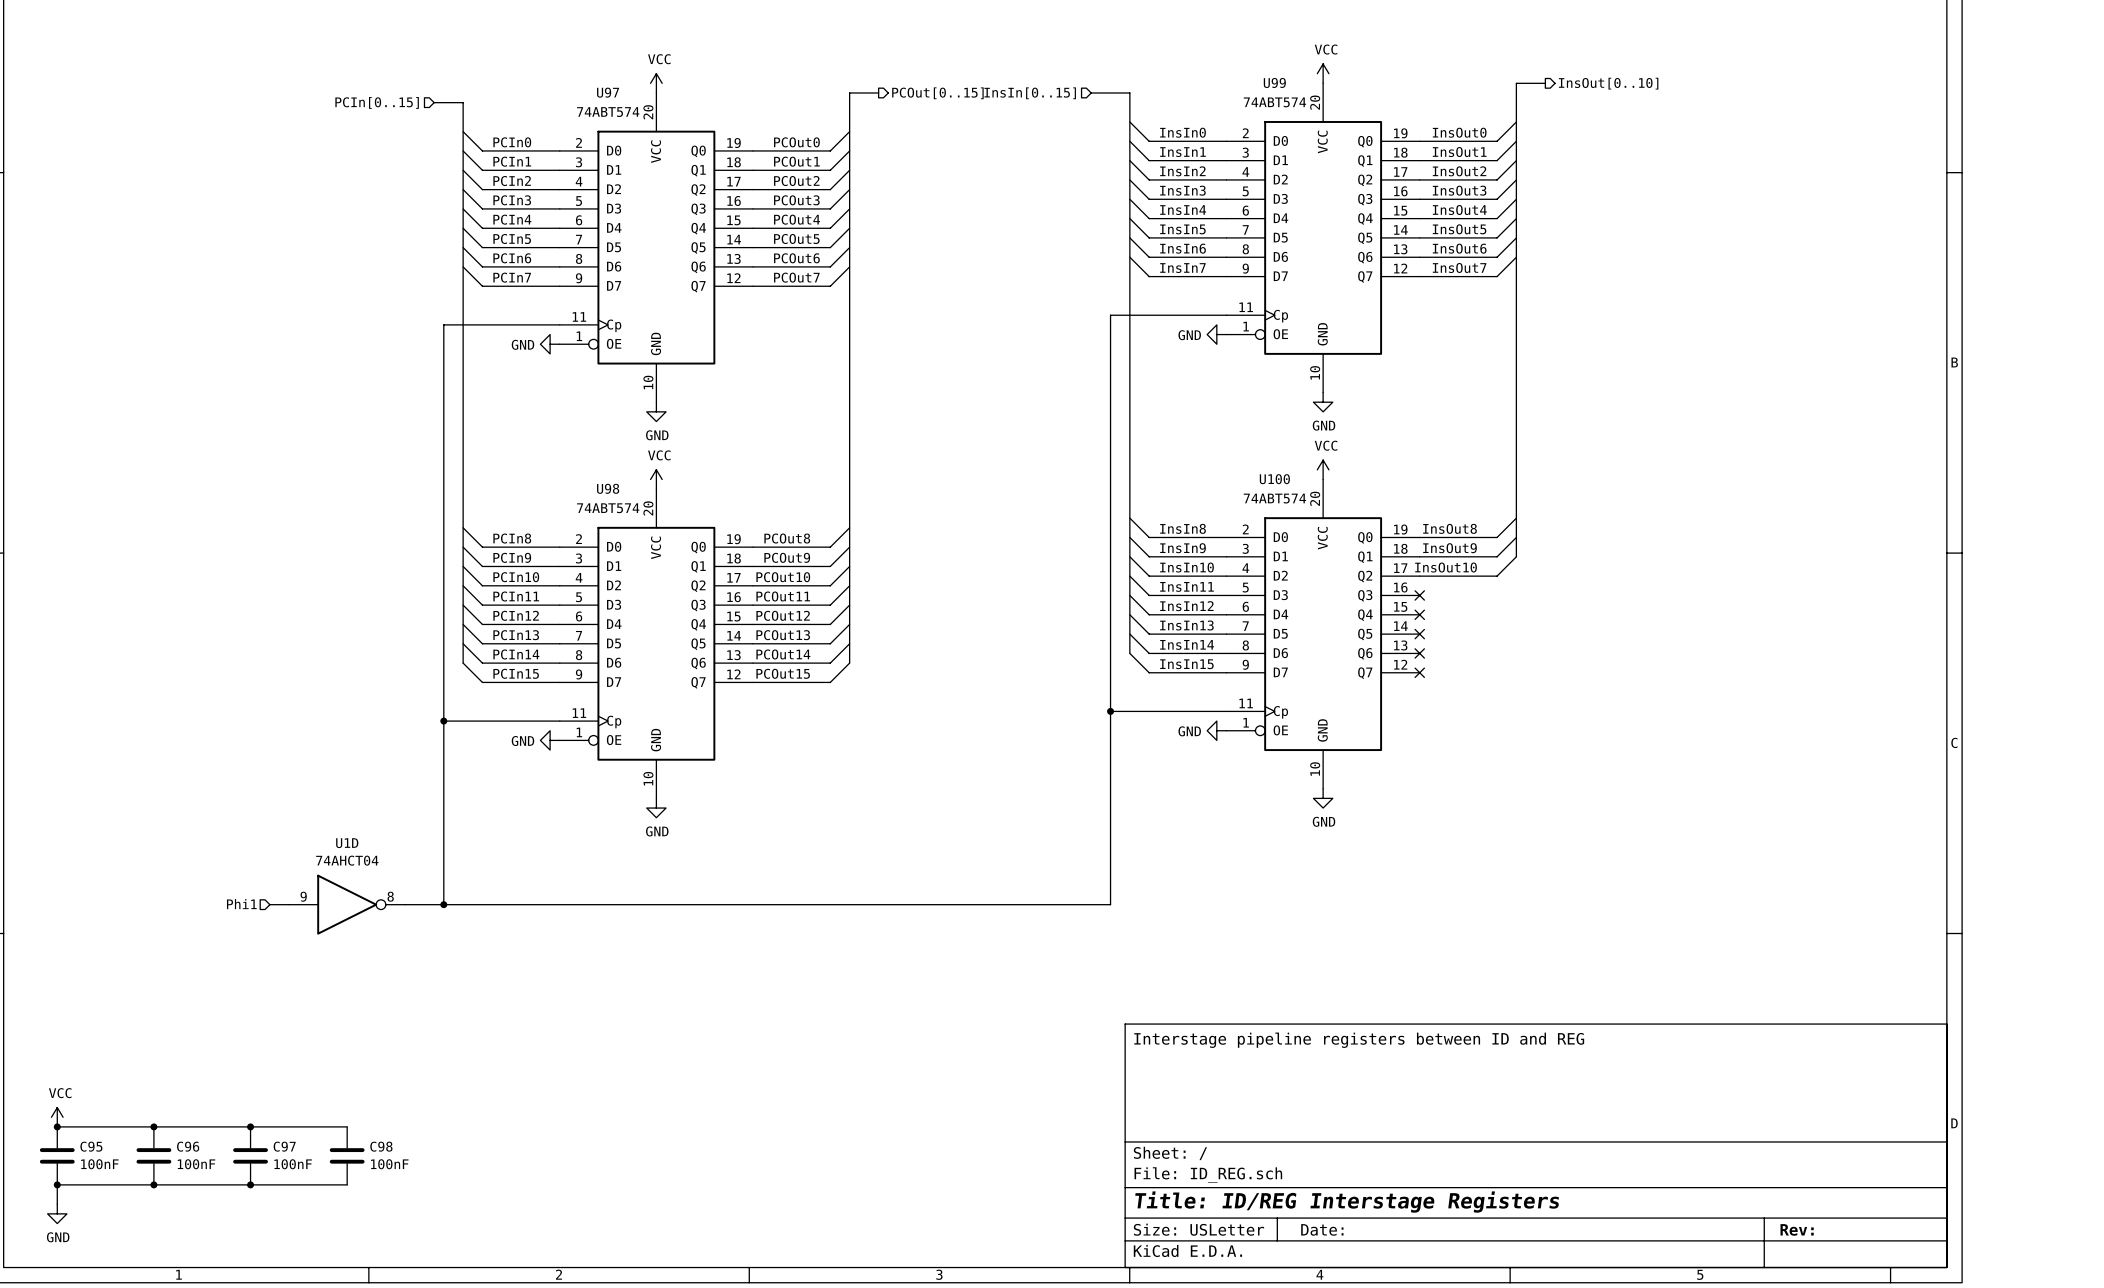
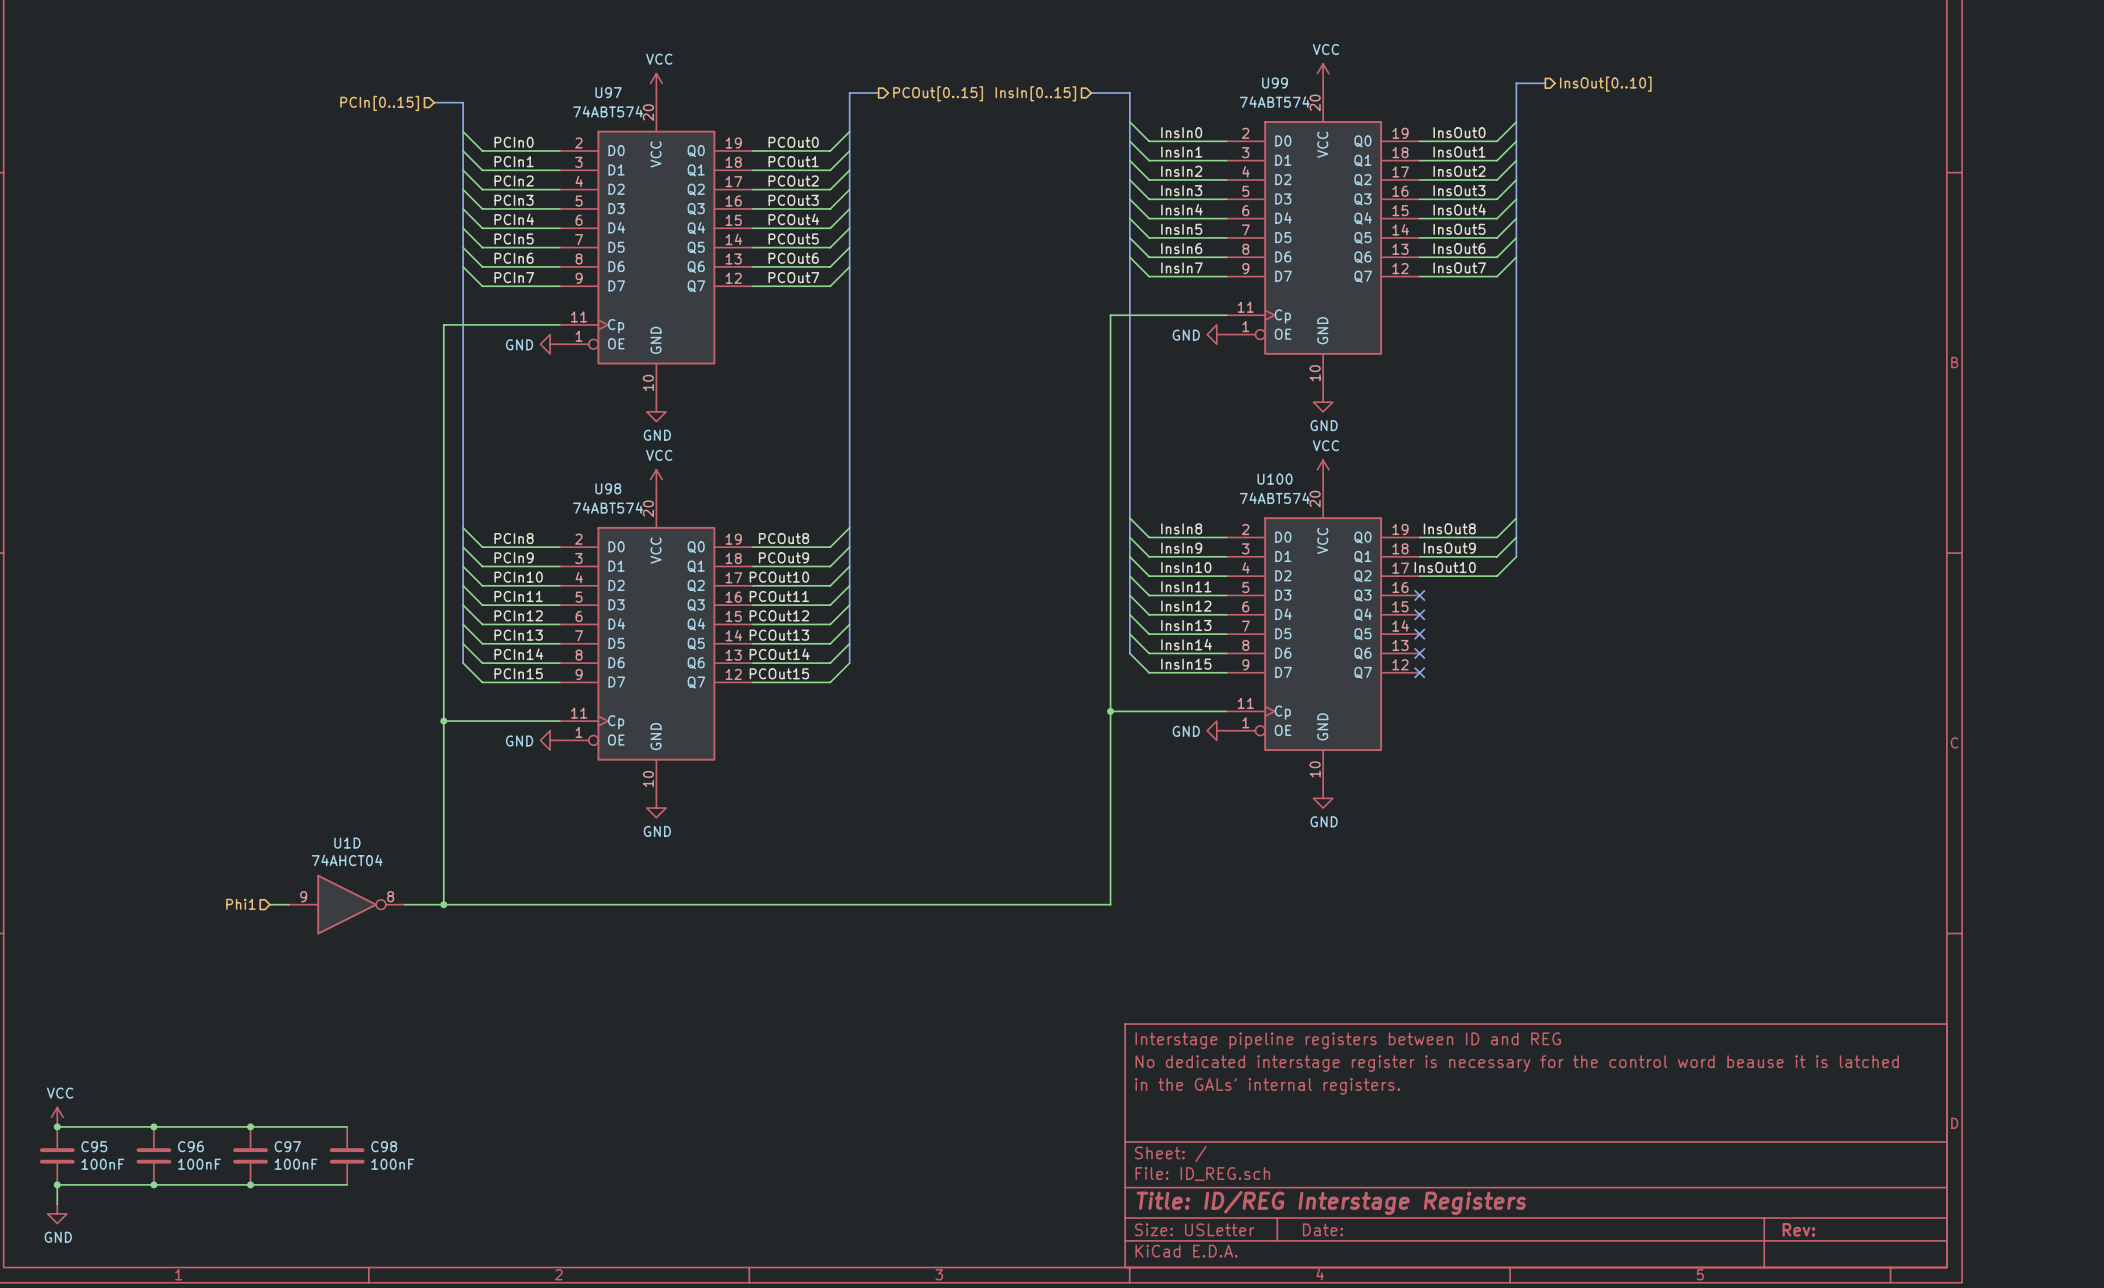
title block: none -> No dedicated interstage register is necessary for the control word beause it is latched (1517, 1063)
title block: none -> in the GALs' internal registers. (1267, 1086)

